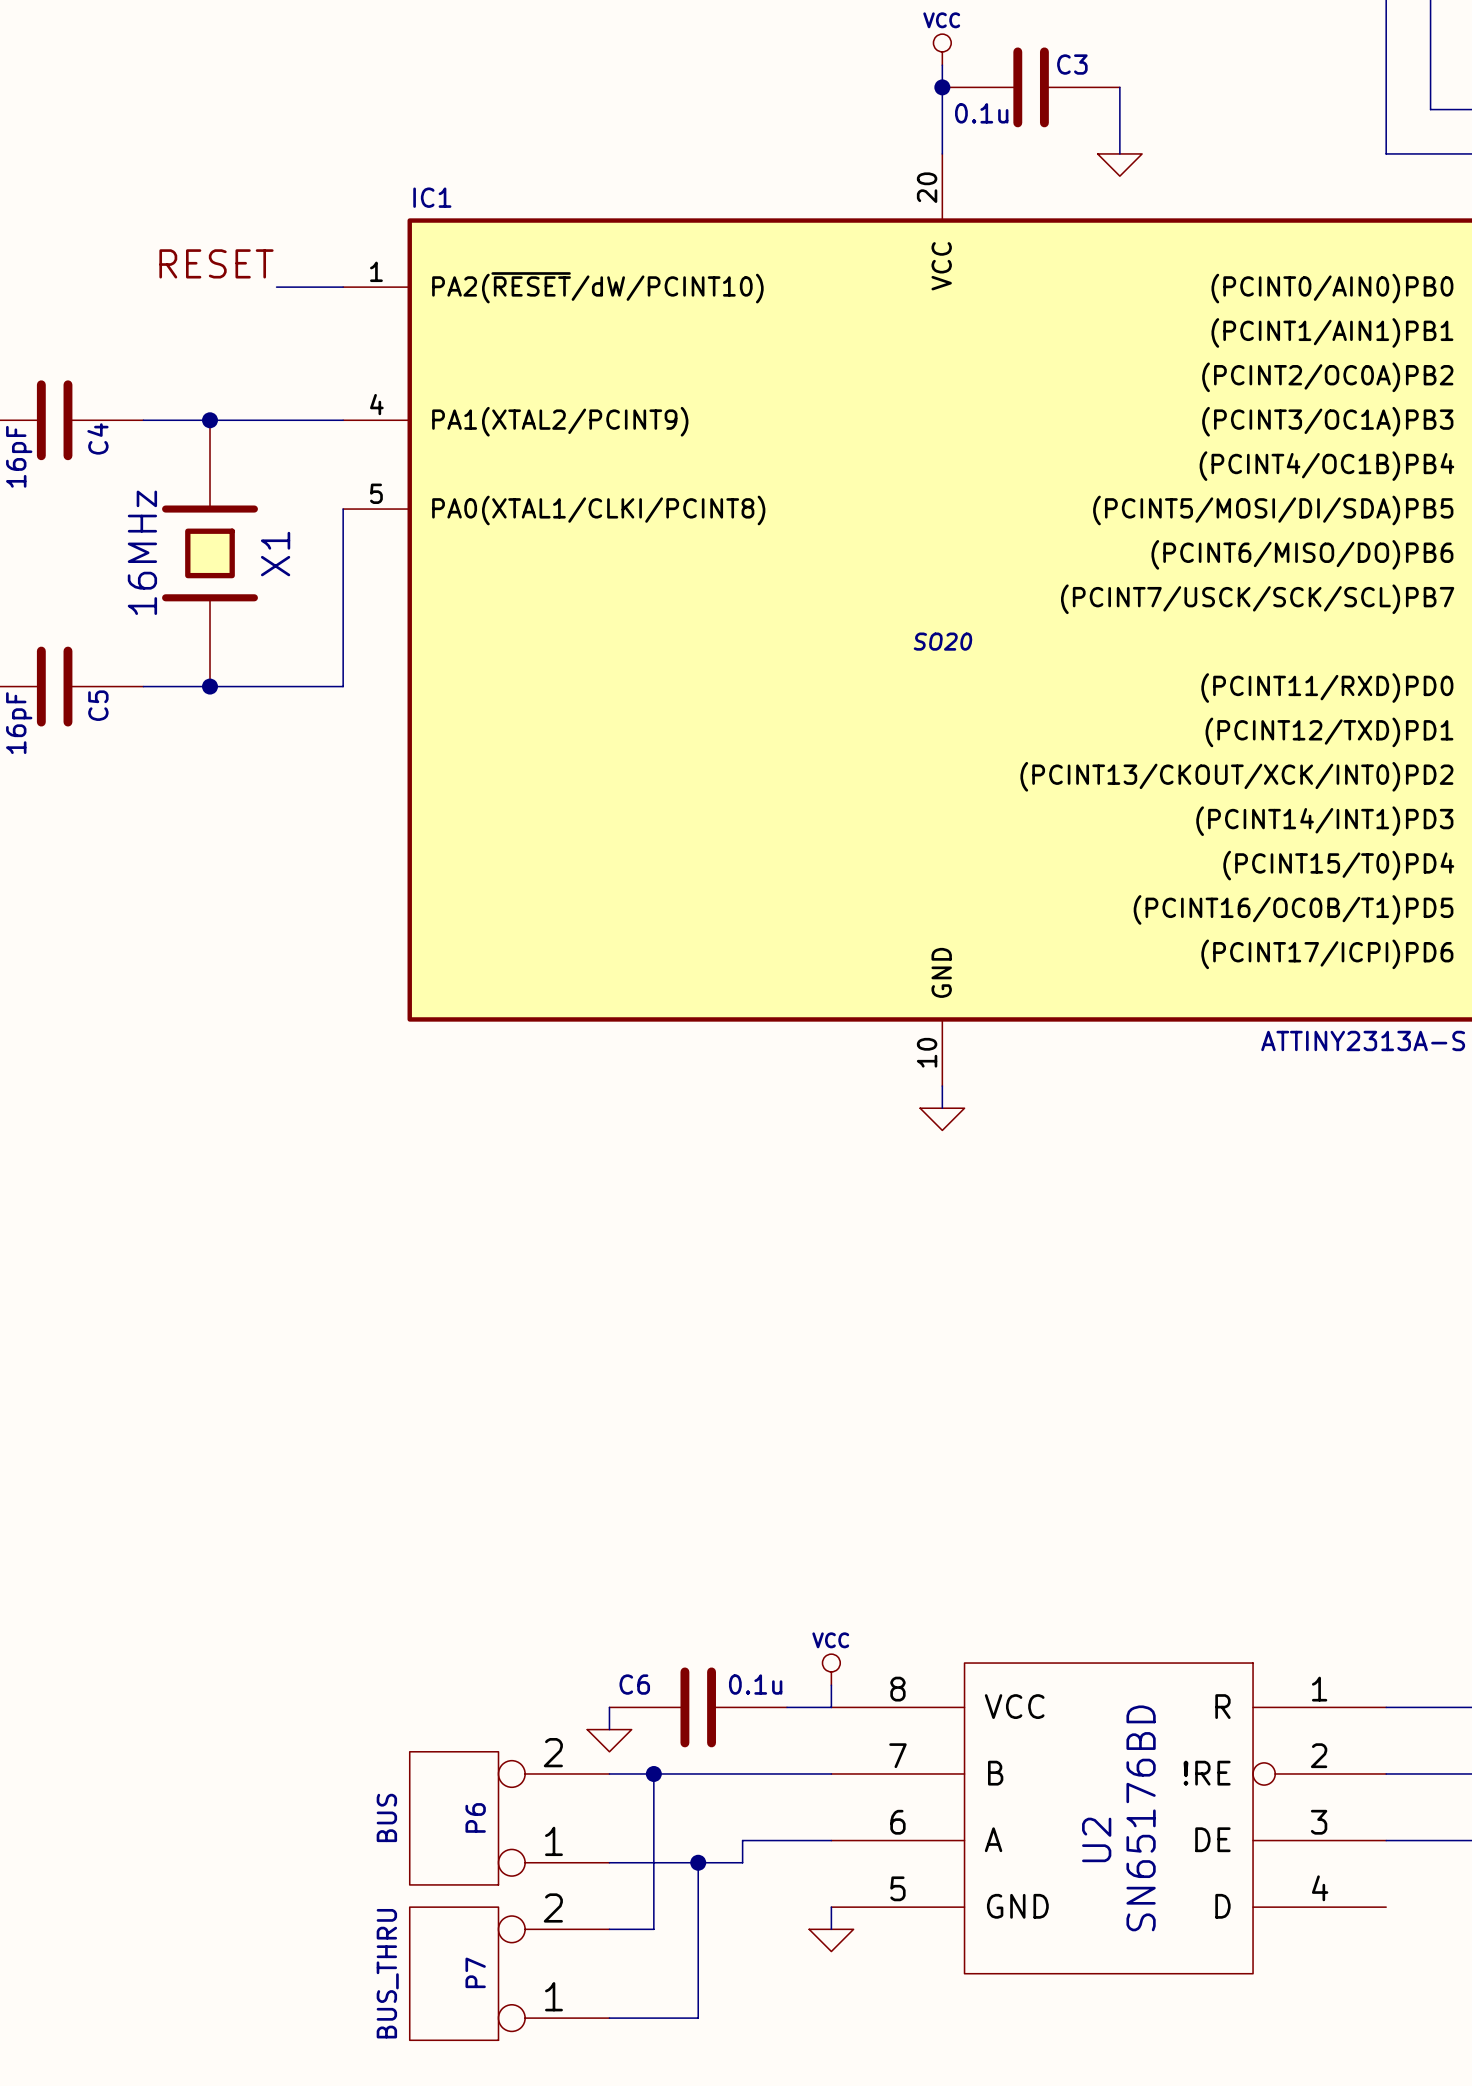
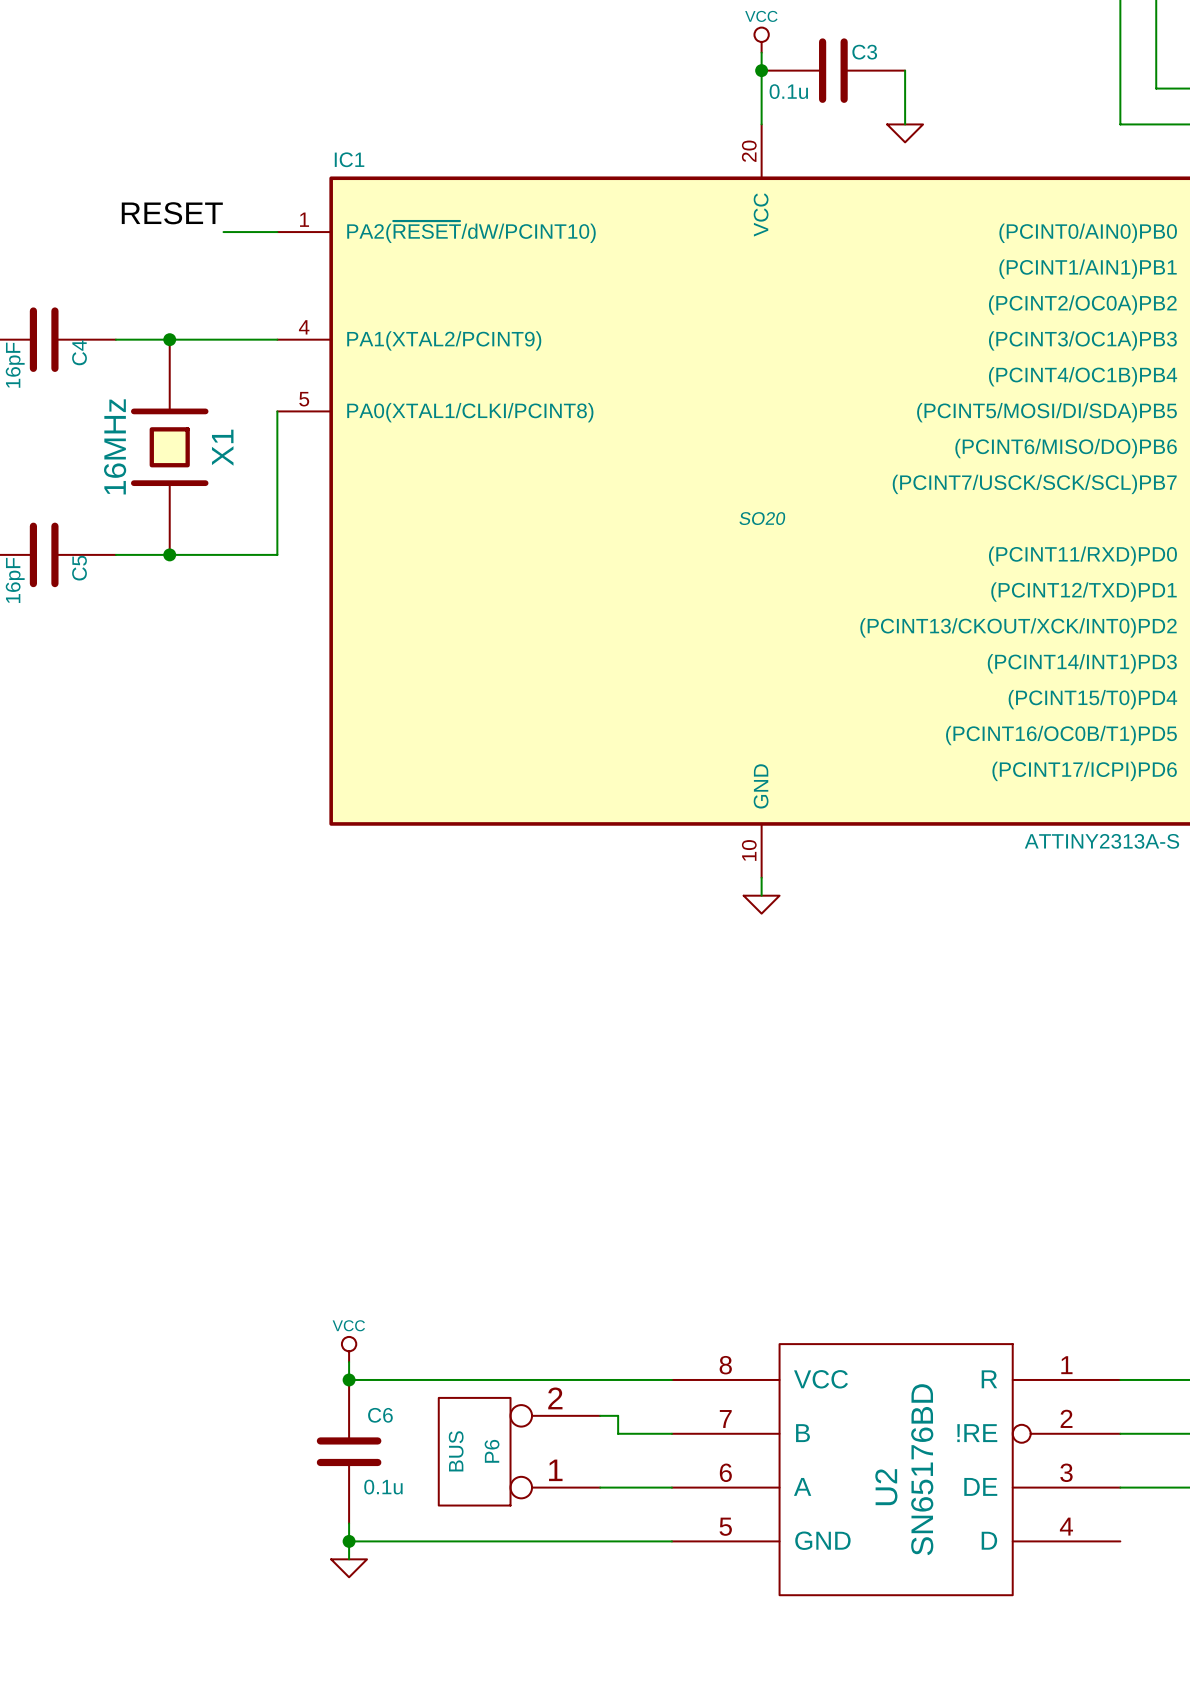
power symbol position: VCC (831, 1669) -> VCC (349, 1349)
wire: none -> (349, 1362) (349, 1379) (636, 1379)
wire: (831, 1685) (831, 1707) -> none
junction: none -> (349, 1379)
wire: (609, 1707) (609, 1729) -> none
C6 rotation: 0° (698, 1707) -> 90° clockwise (349, 1451)
C6 position: (698, 1707) -> (349, 1451)
power symbol: (609, 1740) -> none
wire: (609, 1773) (764, 1773) -> (600, 1415) (618, 1415) (618, 1433)
wire: (653, 1773) (653, 1929) (609, 1929) -> none
junction: (653, 1773) -> none
P6 value position: BUS (386, 1817) -> BUS (456, 1451)
P6 position: (509, 1818) -> (519, 1451)
wire: (742, 1840) (742, 1862) (609, 1862) -> none
wire: (698, 1862) (698, 2018) (609, 2018) -> none
junction: (698, 1862) -> none
wire: none -> (349, 1523) (349, 1559)
junction: none -> (349, 1541)
wire: (831, 1907) (831, 1929) -> (671, 1541) (349, 1541)
power symbol: none -> (349, 1568)
power symbol: (831, 1940) -> none
P7: BUS_THRU (509, 1973) -> none

